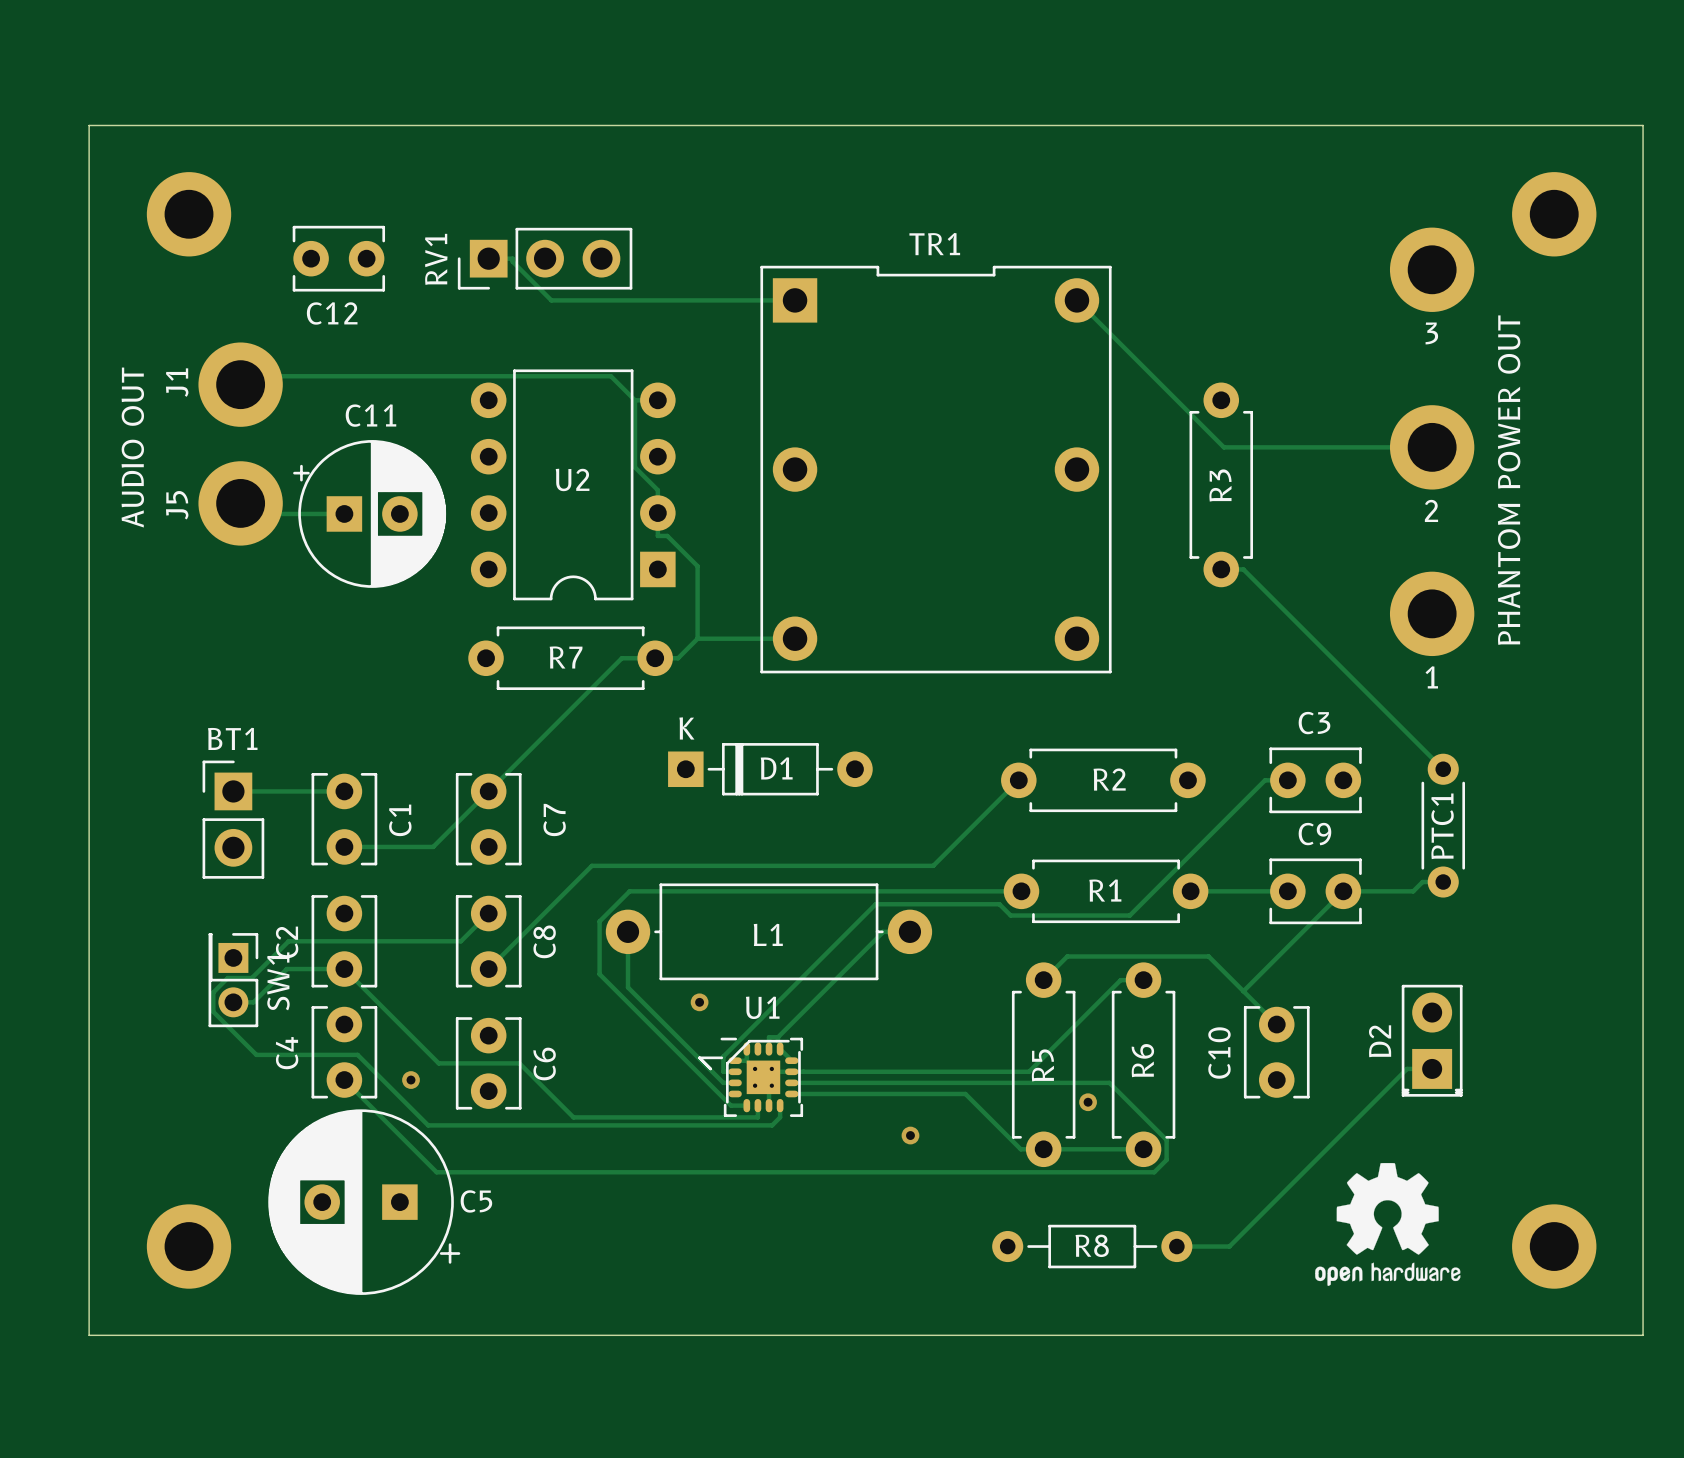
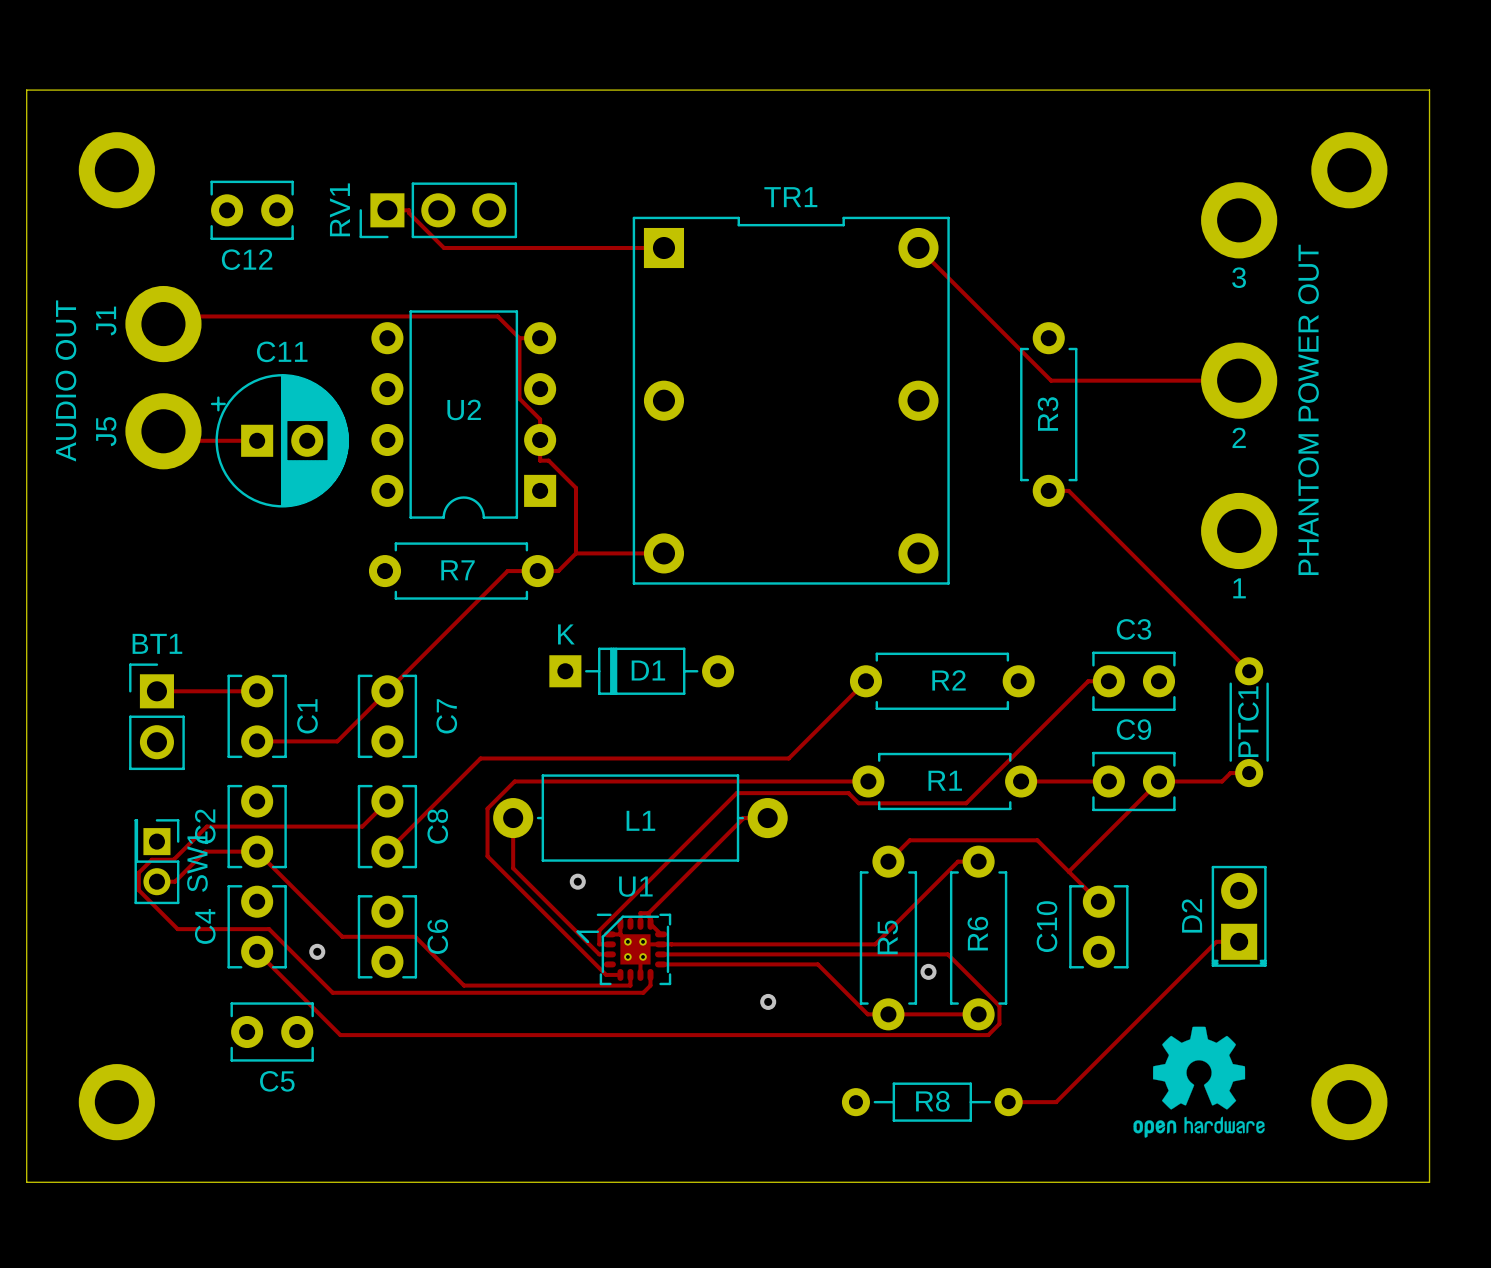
C5 footprint: [268, 1109, 461, 1295] -> [230, 1002, 314, 1062]
C5 name position: C5 (476, 1201) -> C5 (277, 1081)

